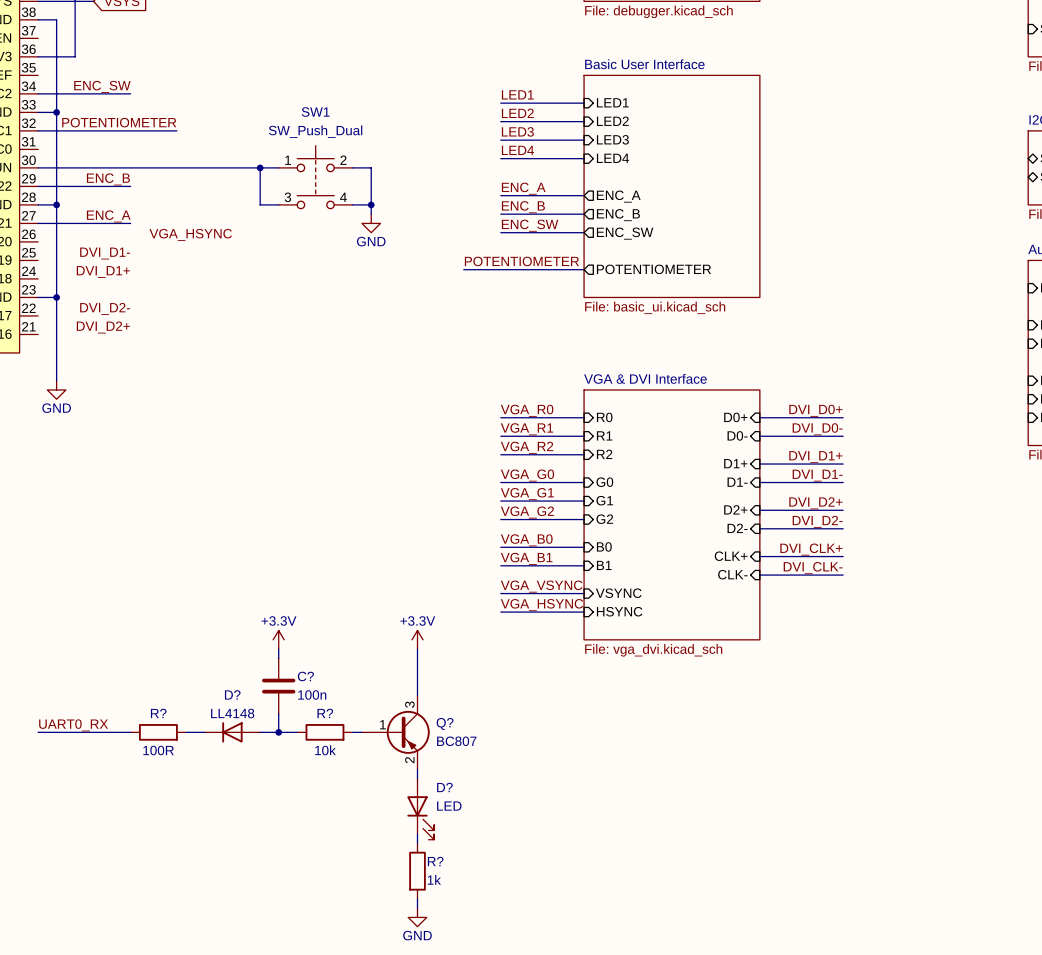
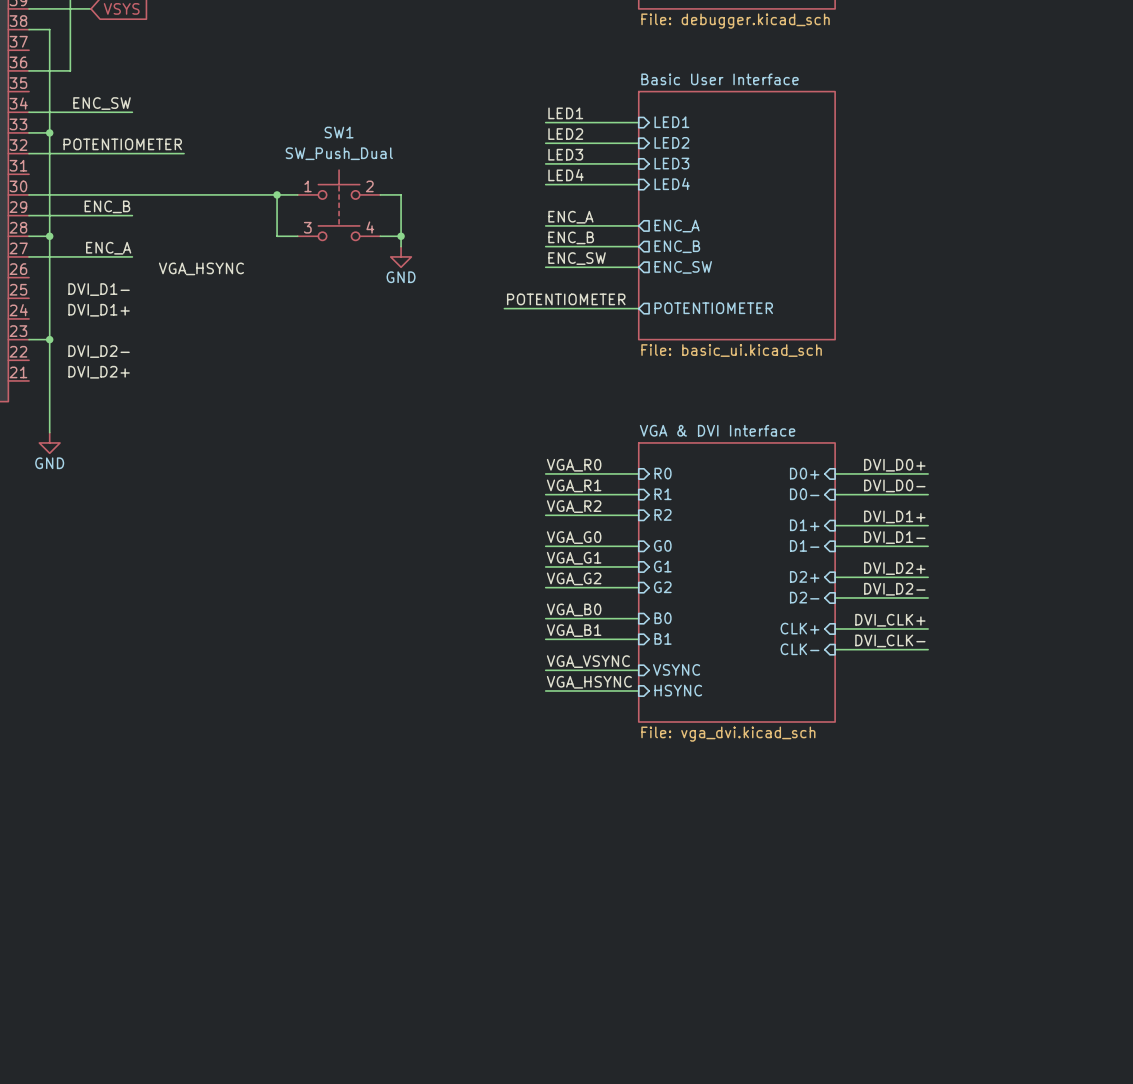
power symbol: +3.3V (278, 639) -> none
power symbol: +3.3V (417, 639) -> none
wire: (278, 649) (278, 658) -> none
wire: (417, 649) (417, 695) -> none
C?: 100n (278, 686) -> none
wire: (278, 713) (278, 732) -> none
label: UART0_RX (73, 725) -> none
wire: (38, 732) (130, 732) -> none
R?: 100R (158, 732) -> none
wire: (186, 732) (204, 732) -> none
D?: LL4148 (232, 732) -> none
wire: (260, 732) (297, 732) -> none
junction: (278, 732) -> none
R?: 10k (324, 732) -> none
wire: (352, 732) (361, 732) -> none
Q?: BC807 (395, 732) -> none
wire: (417, 769) (417, 778) -> none
D?: LED (420, 809) -> none
wire: (417, 834) (417, 843) -> none
R?: 1k (417, 871) -> none
wire: (417, 898) (417, 908) -> none
power symbol: GND (417, 917) -> none

